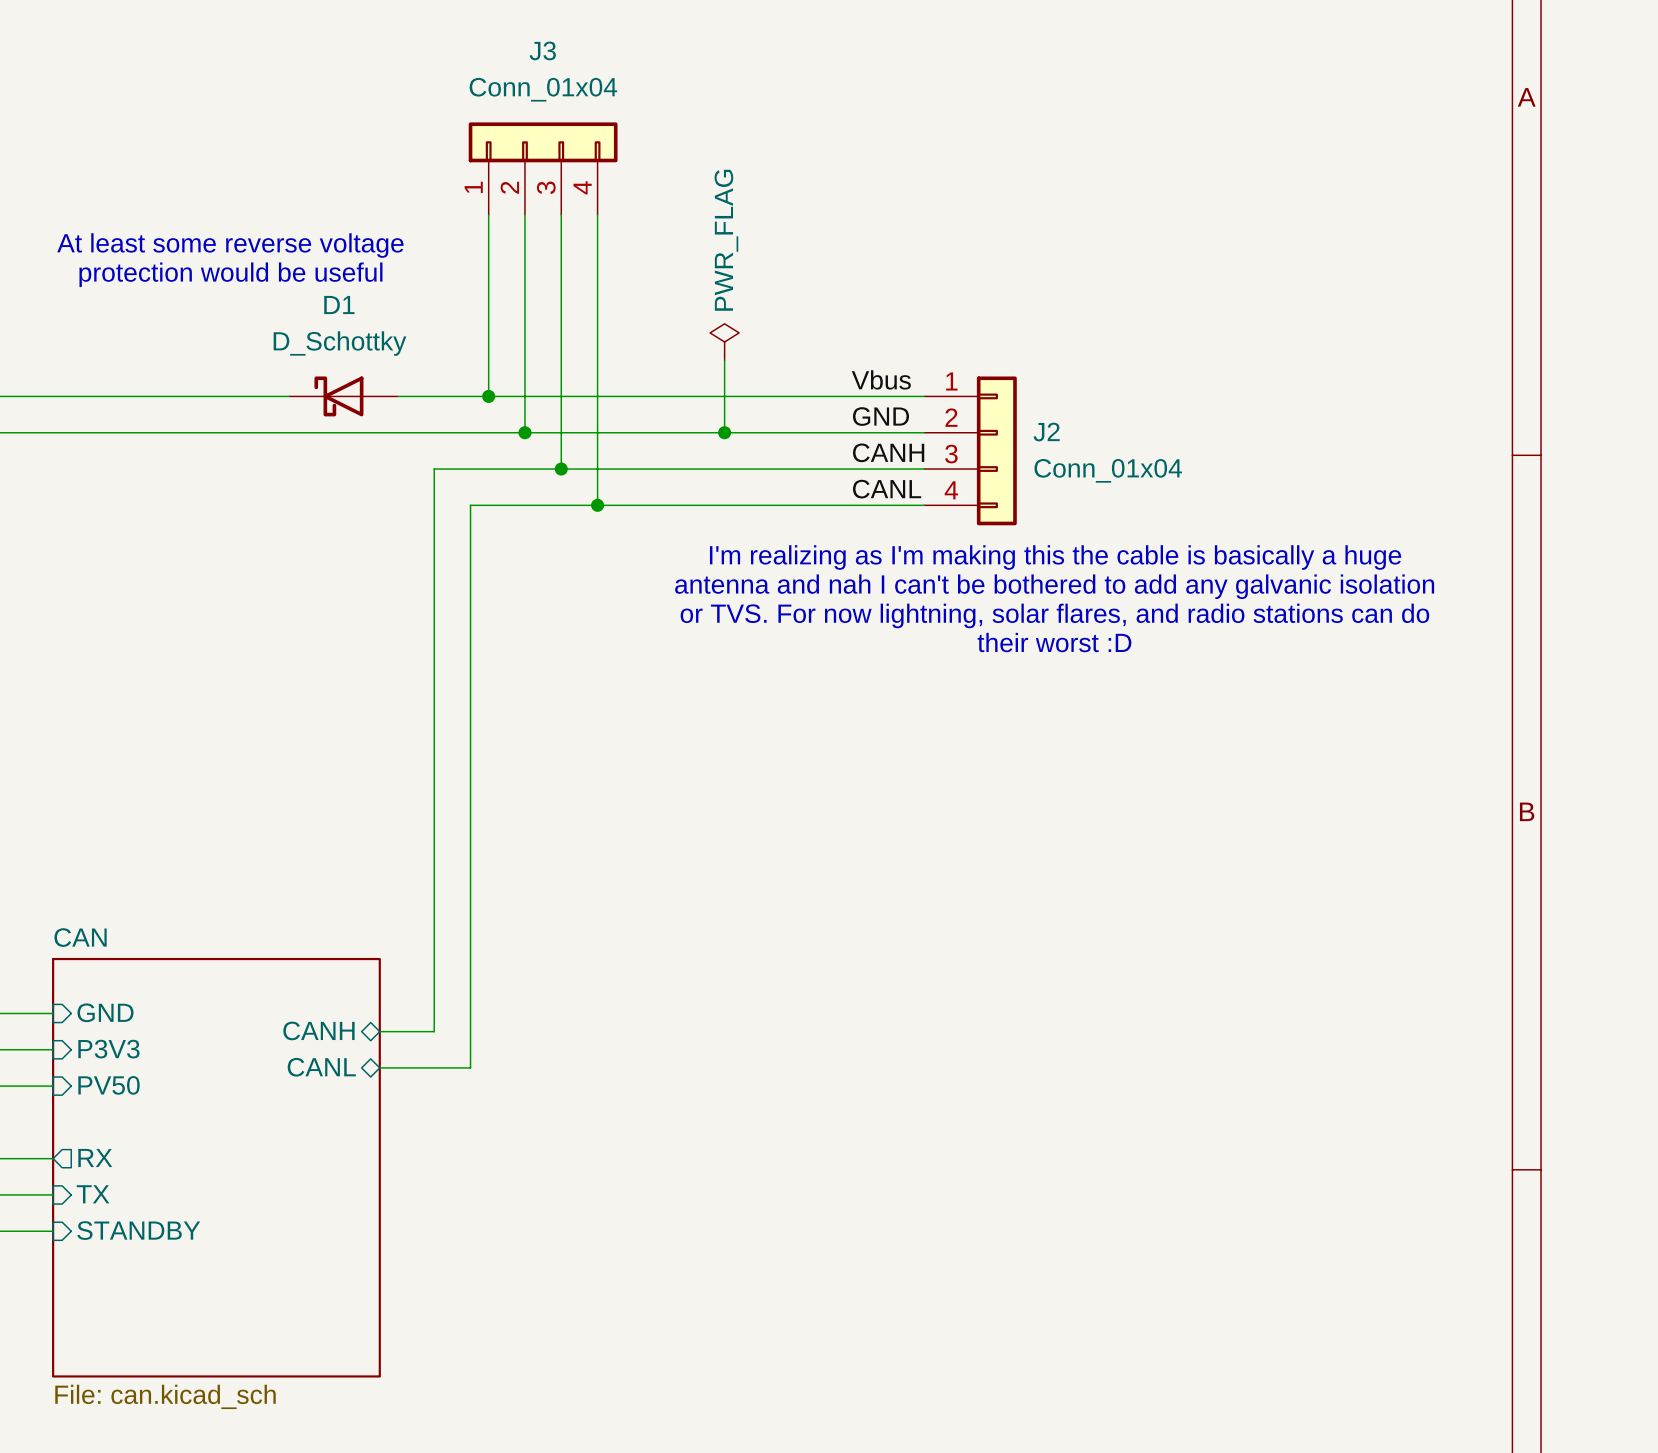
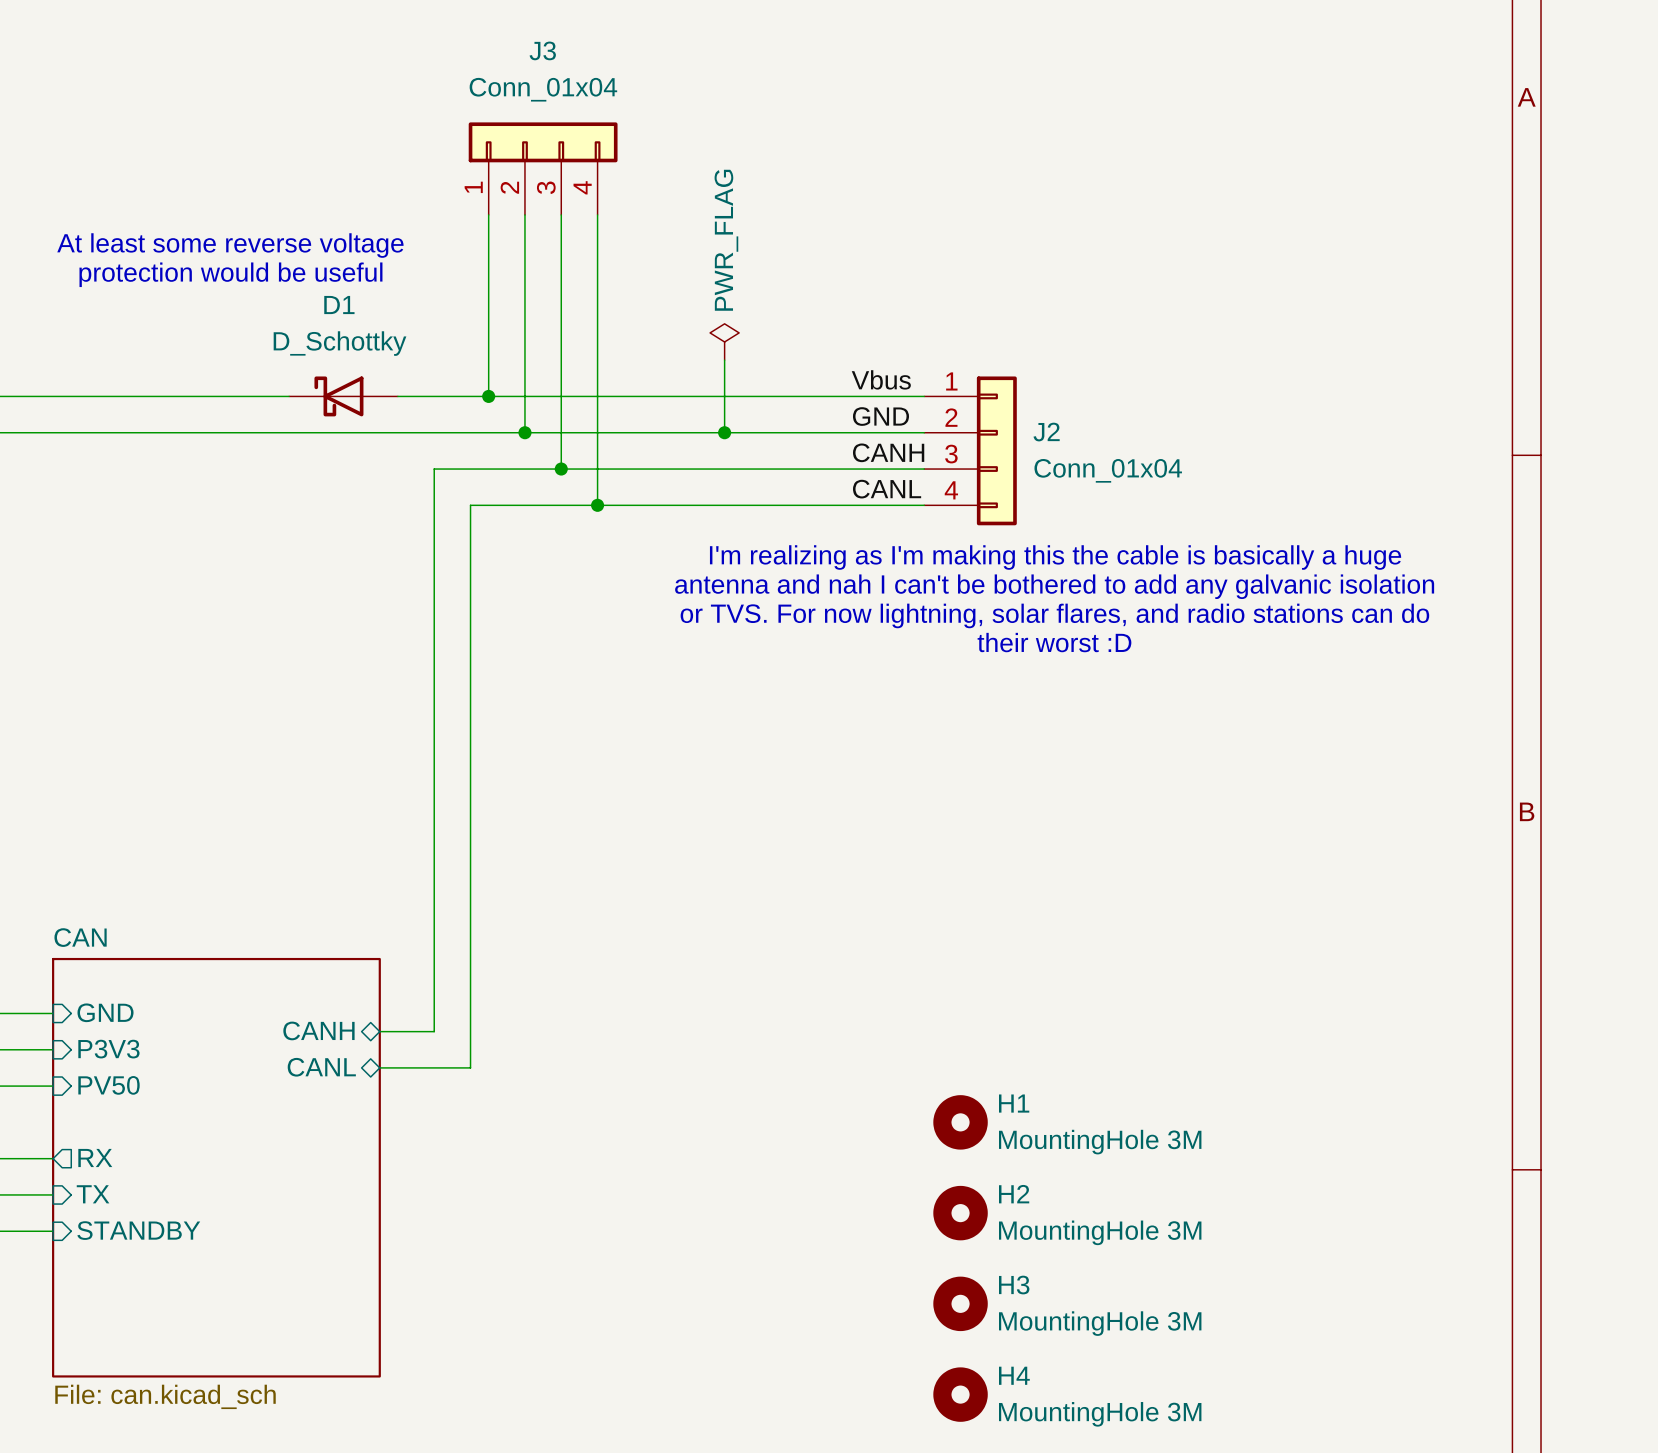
H1: none -> MountingHole 3M (960, 1122)
H2: none -> MountingHole 3M (960, 1213)
H3: none -> MountingHole 3M (960, 1303)
H4: none -> MountingHole 3M (960, 1394)

